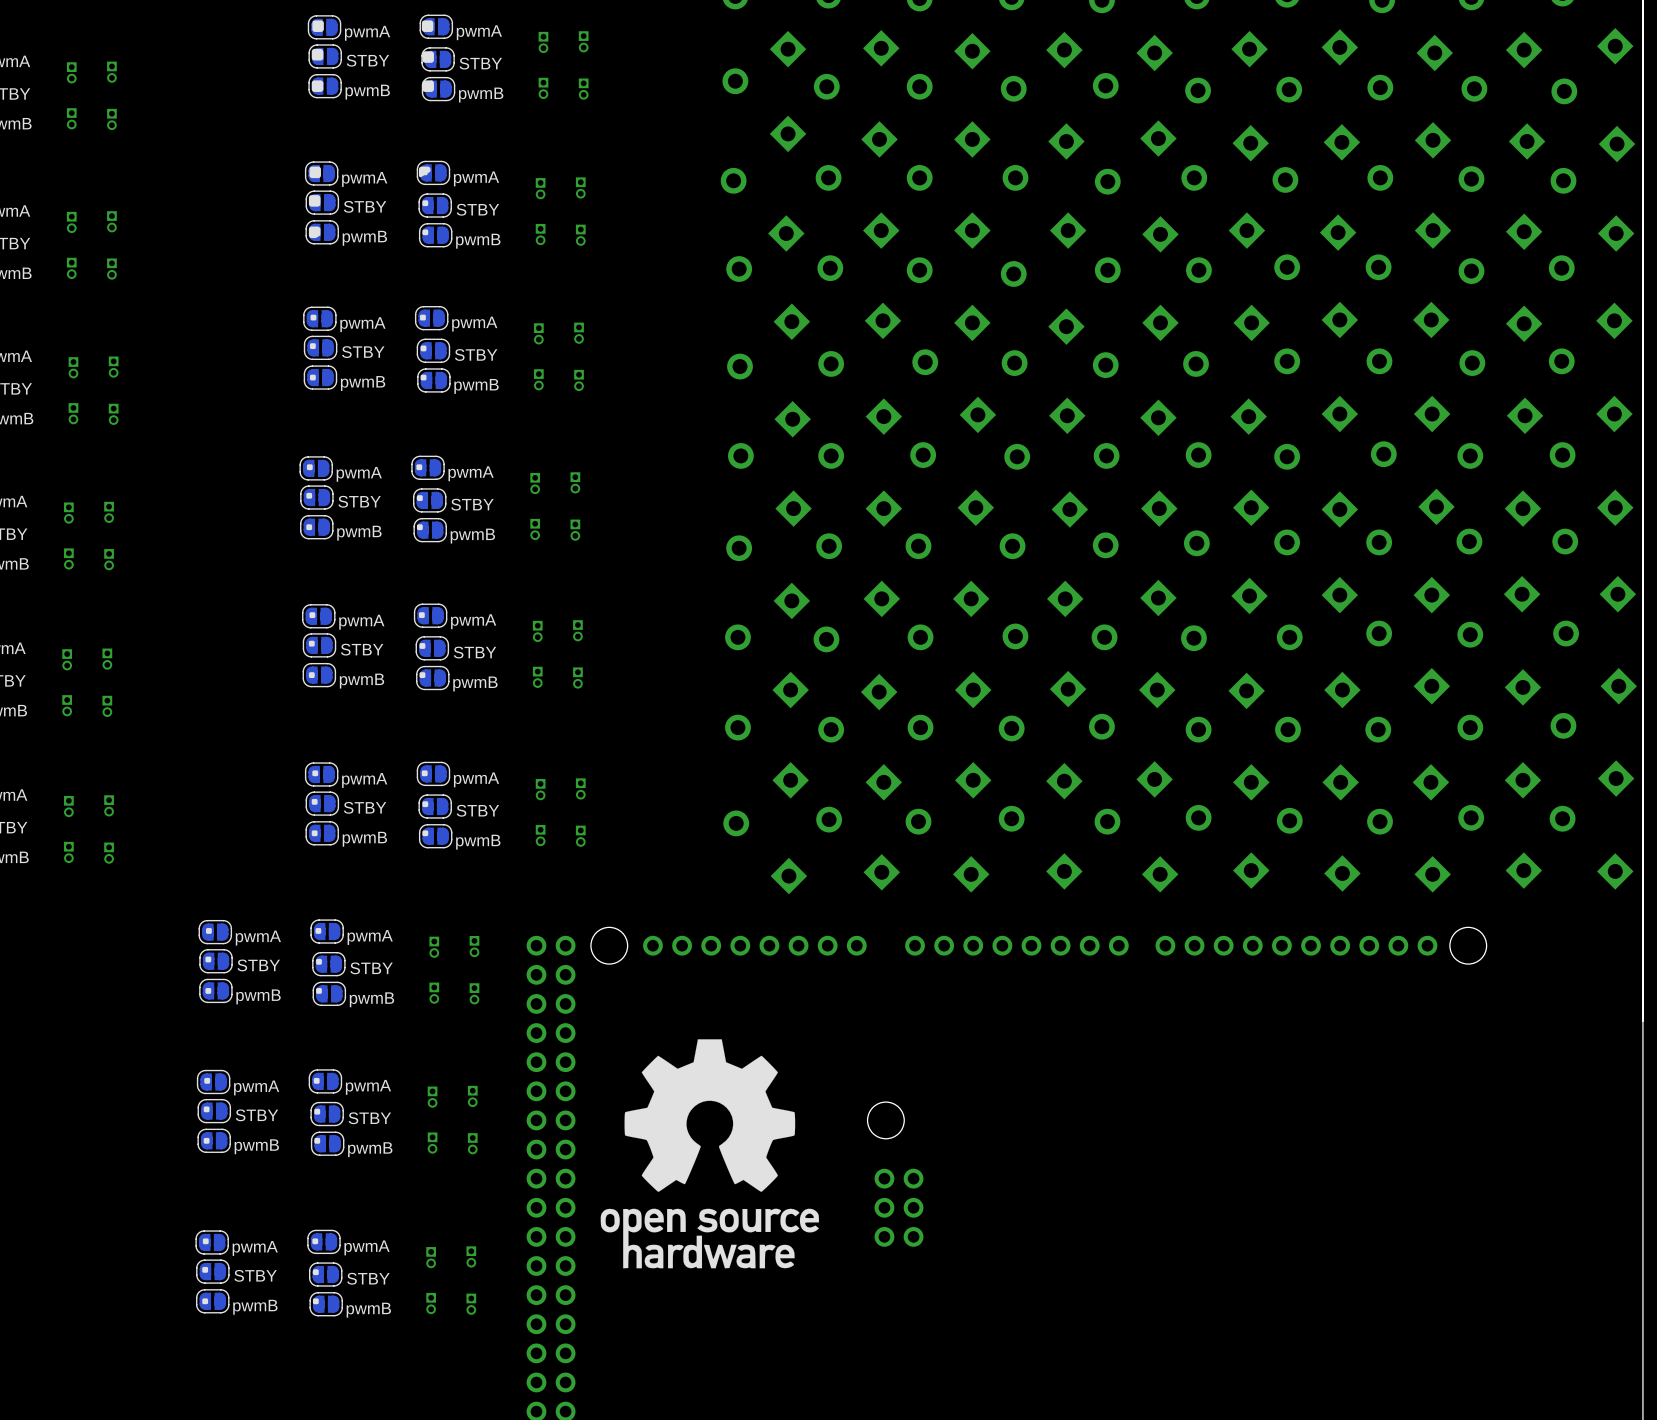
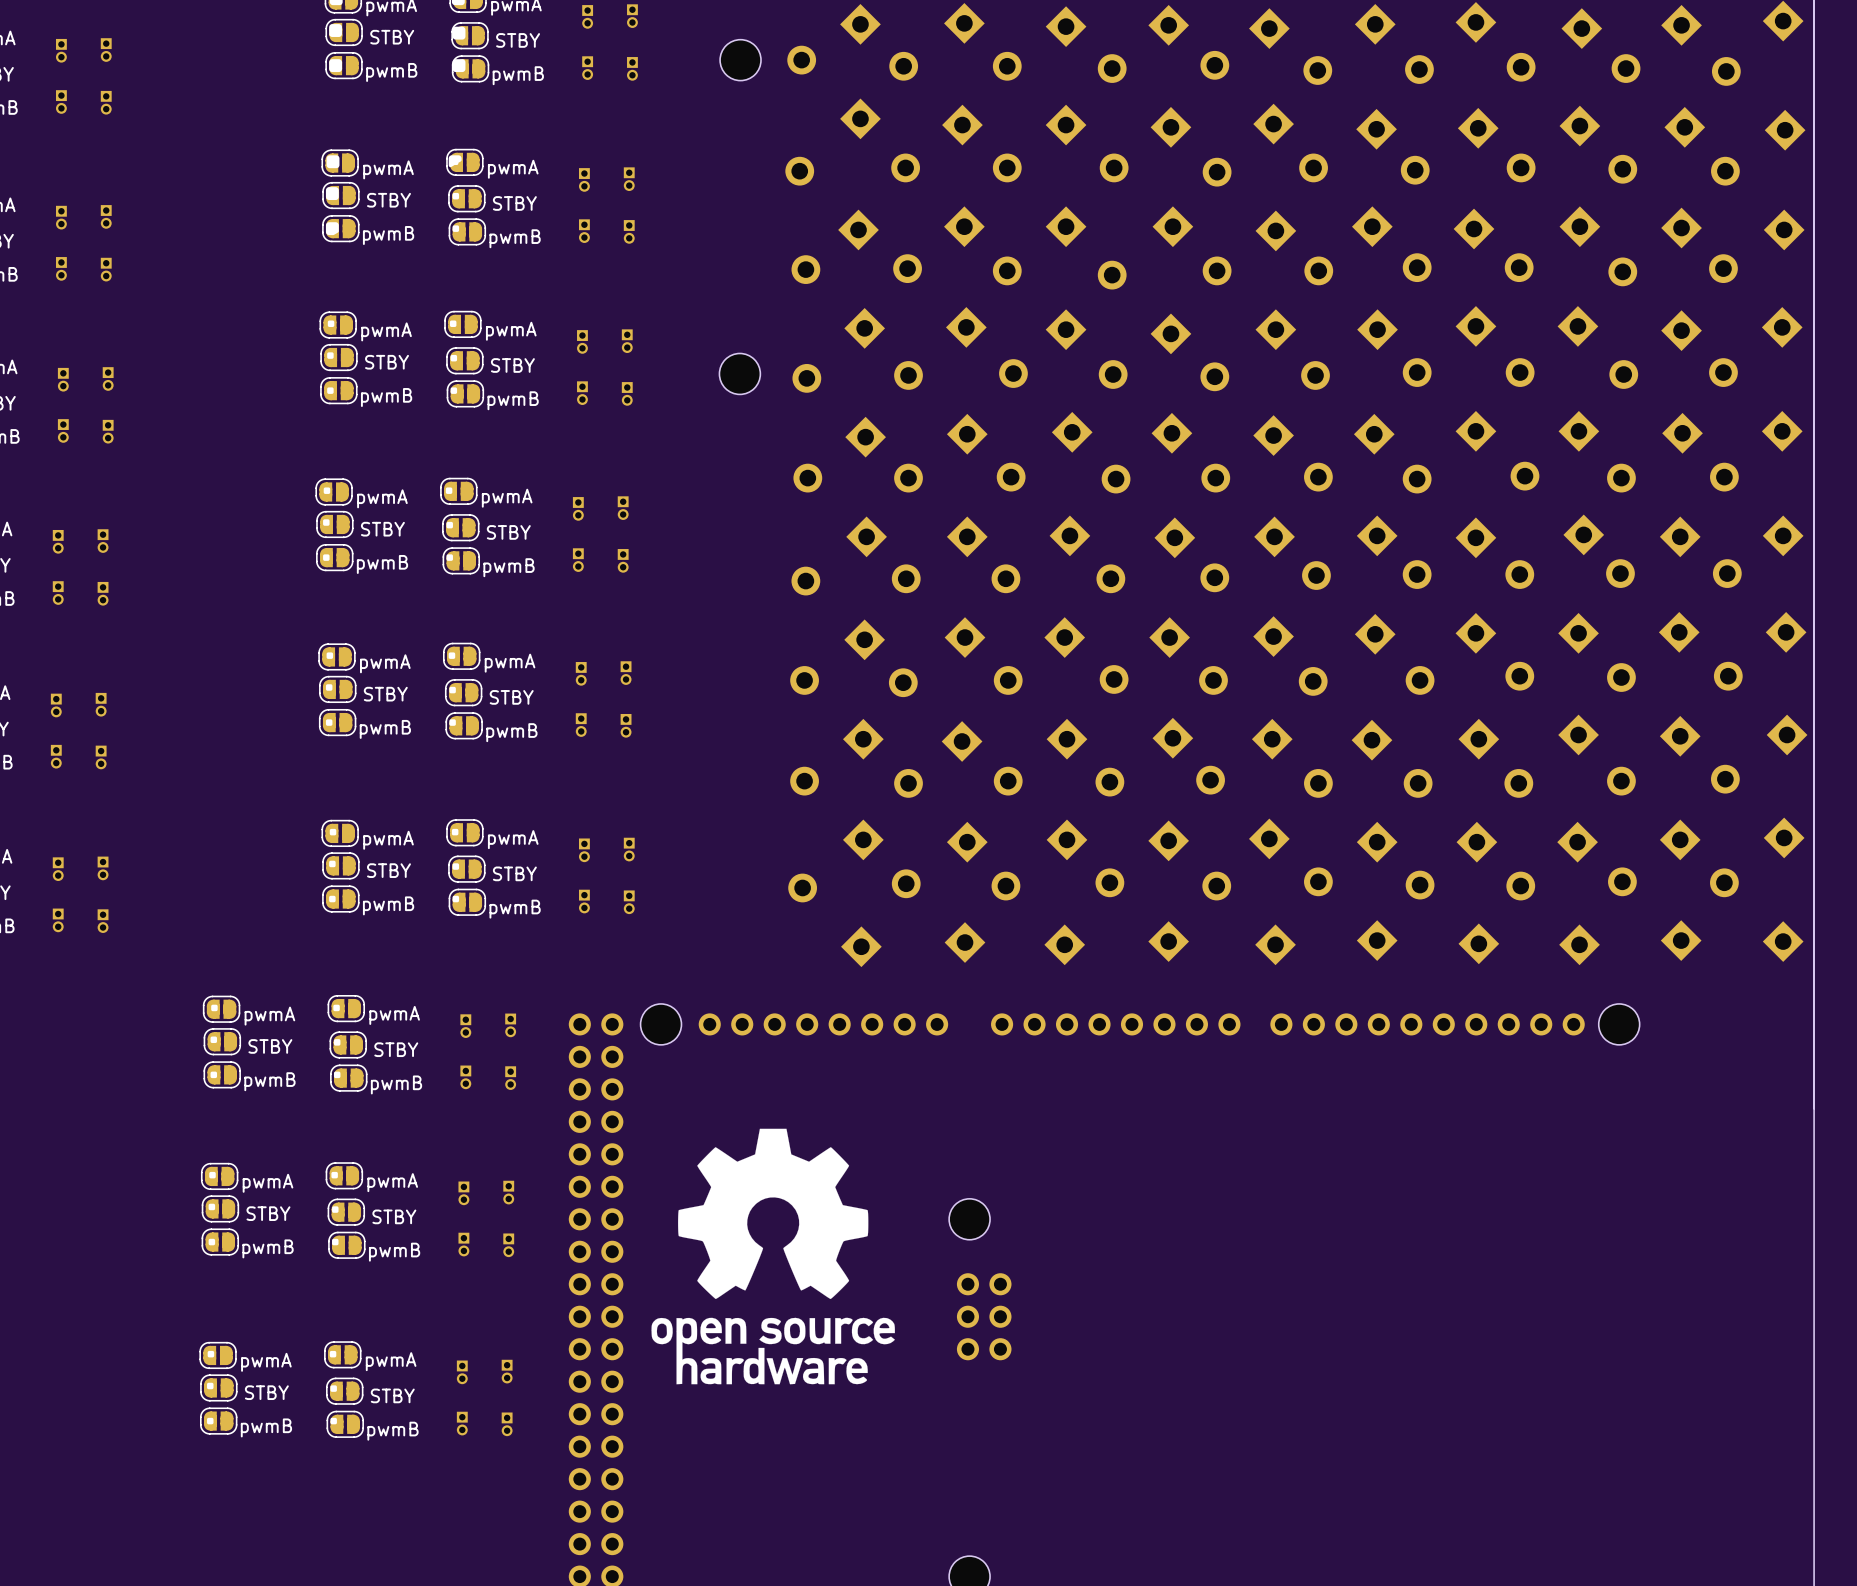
part: none -> (740, 60)
part: none -> (739, 373)

